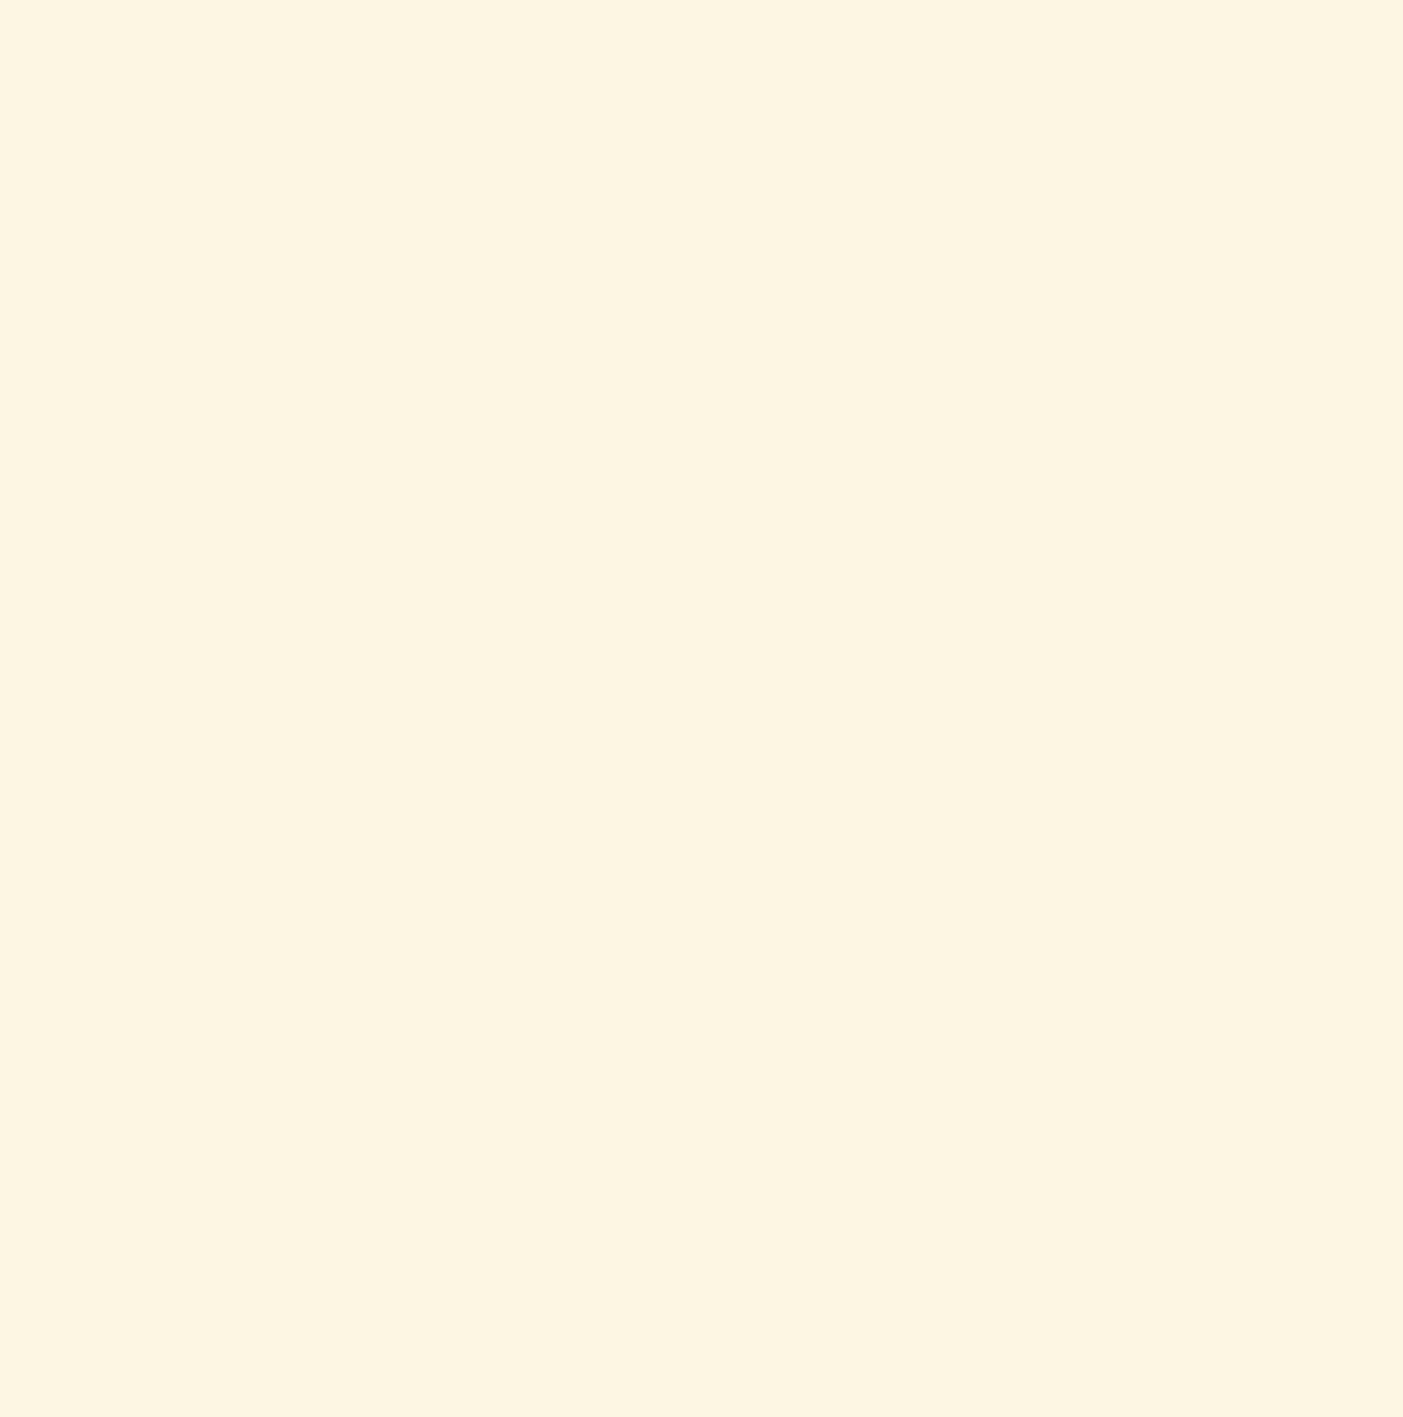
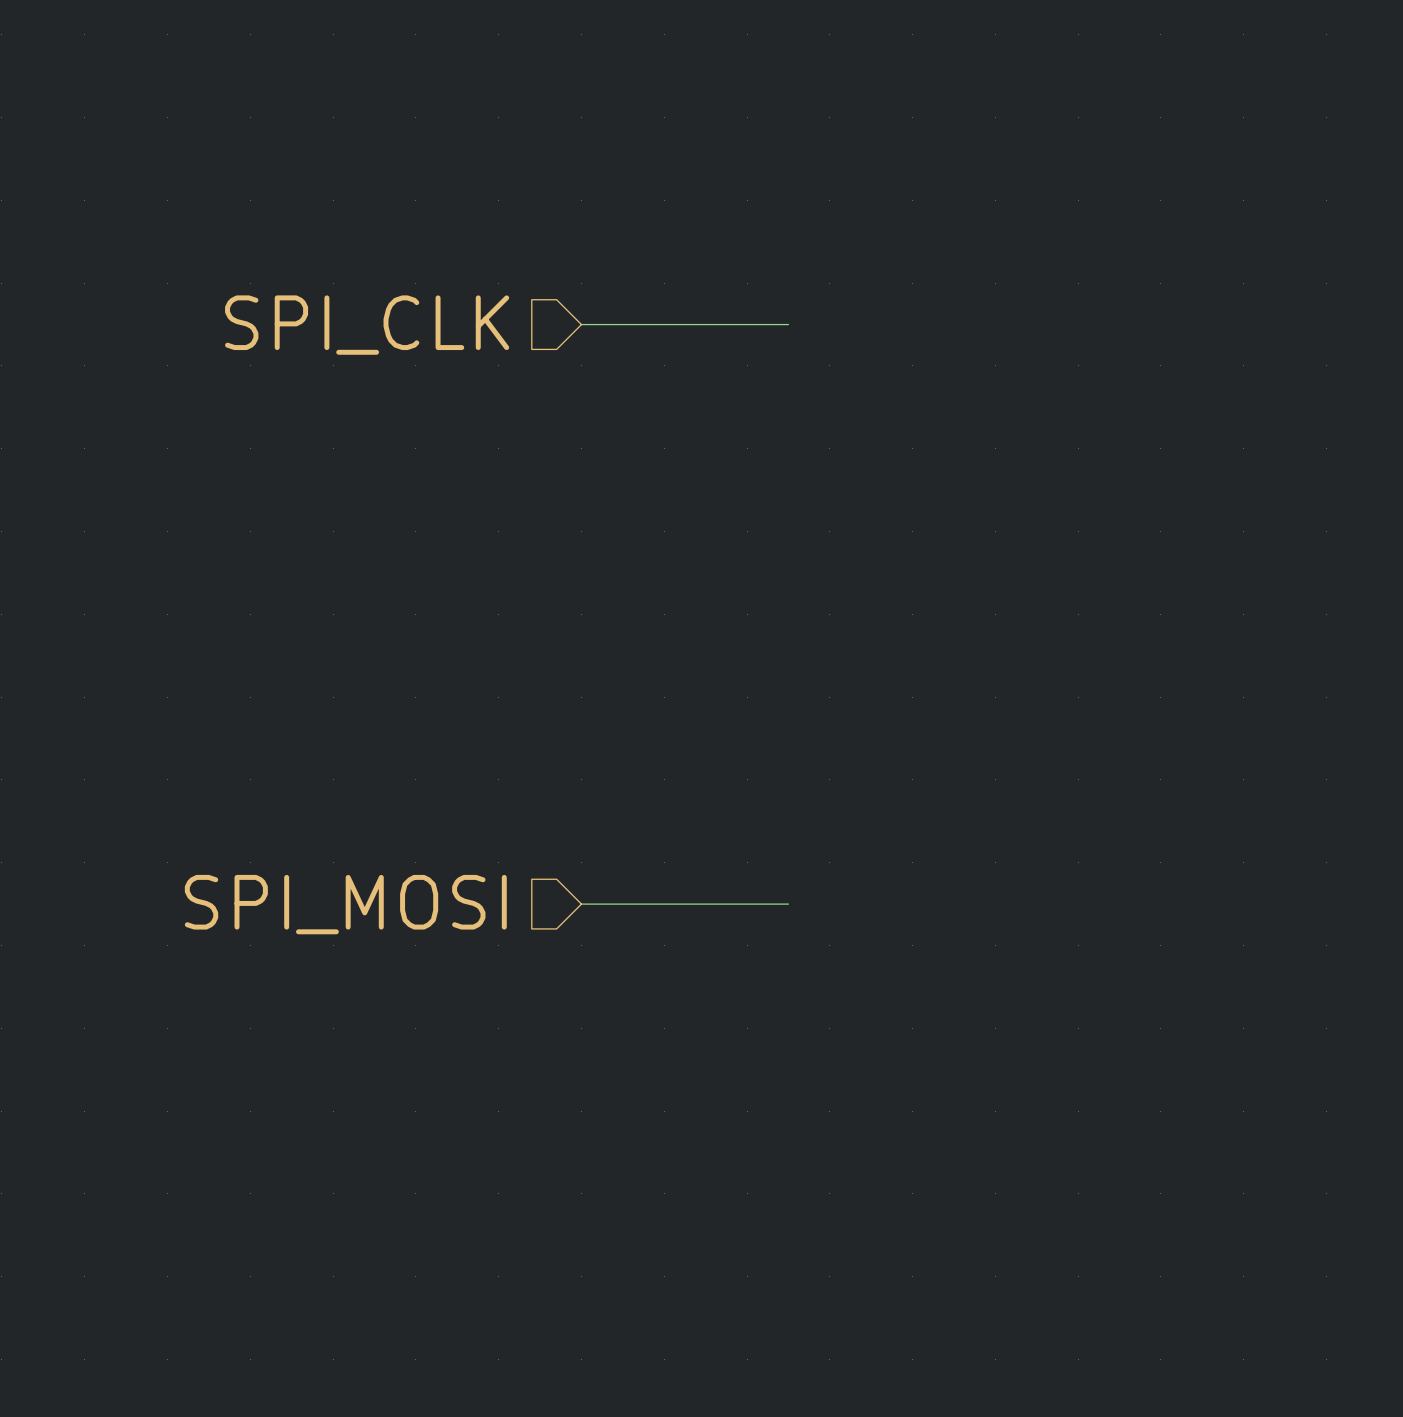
wire: none -> (581, 324) (788, 324)
hierarchical label: none -> SPI_CLK (367, 325)
hierarchical label: none -> SPI_MOSI (345, 904)
wire: none -> (581, 904) (788, 904)

